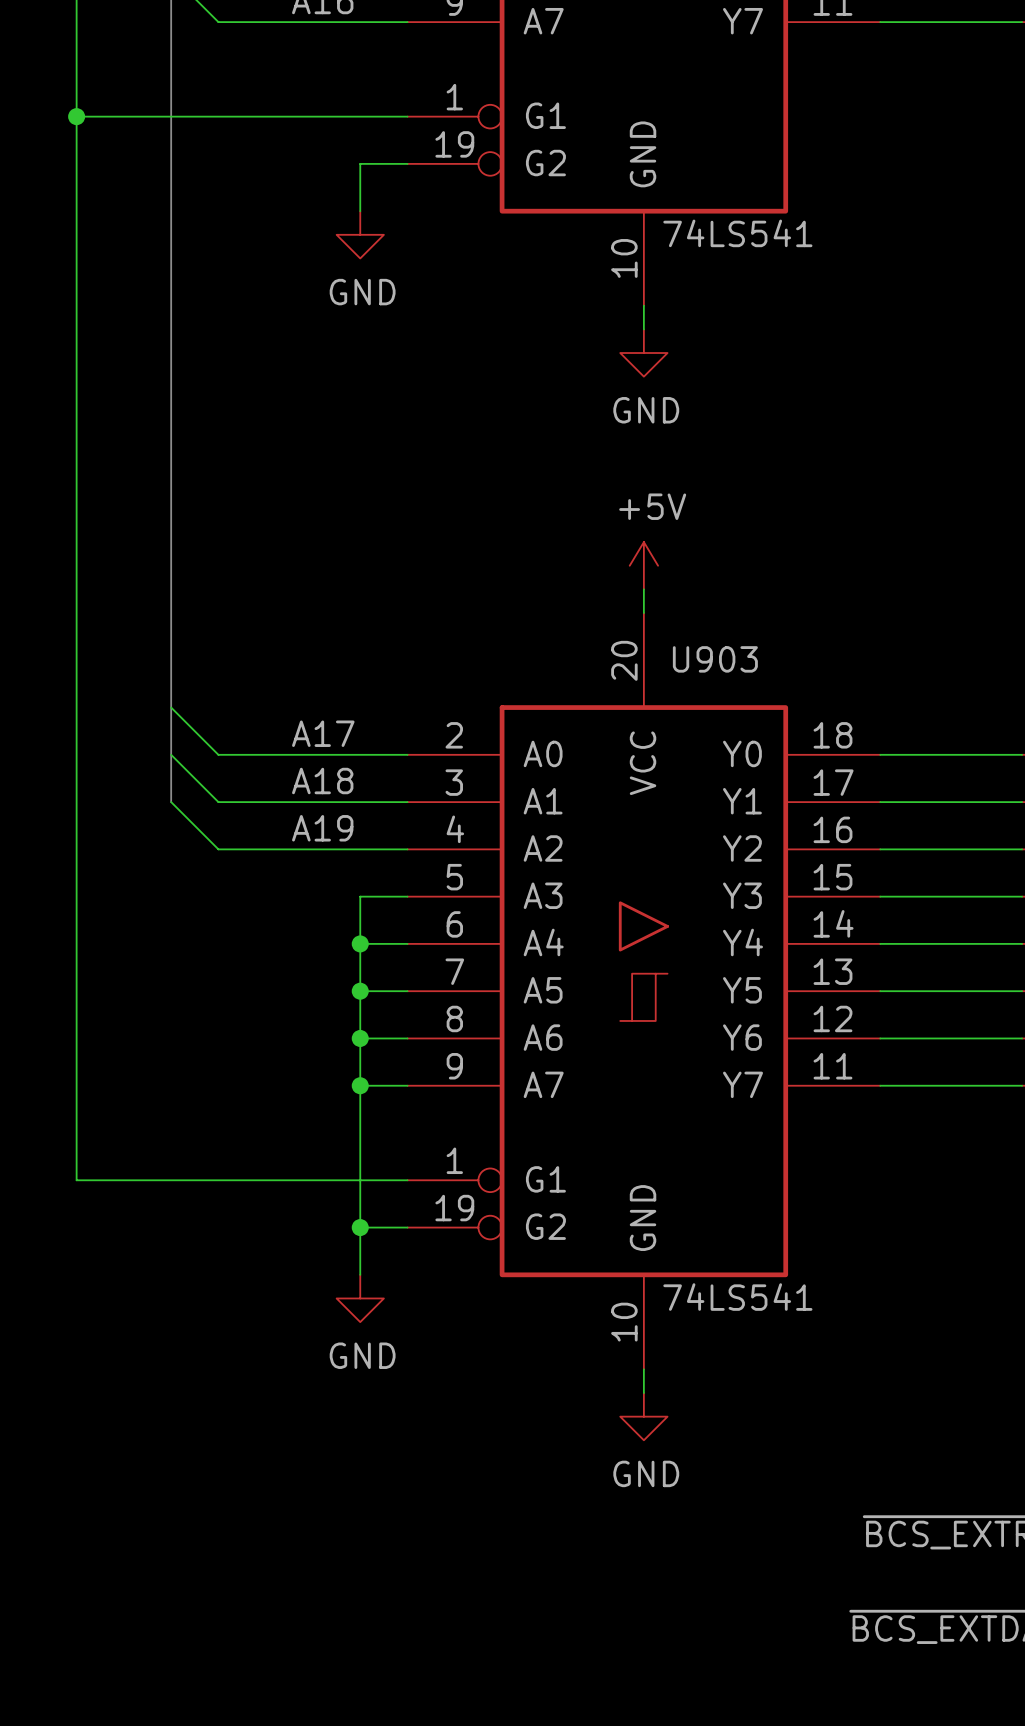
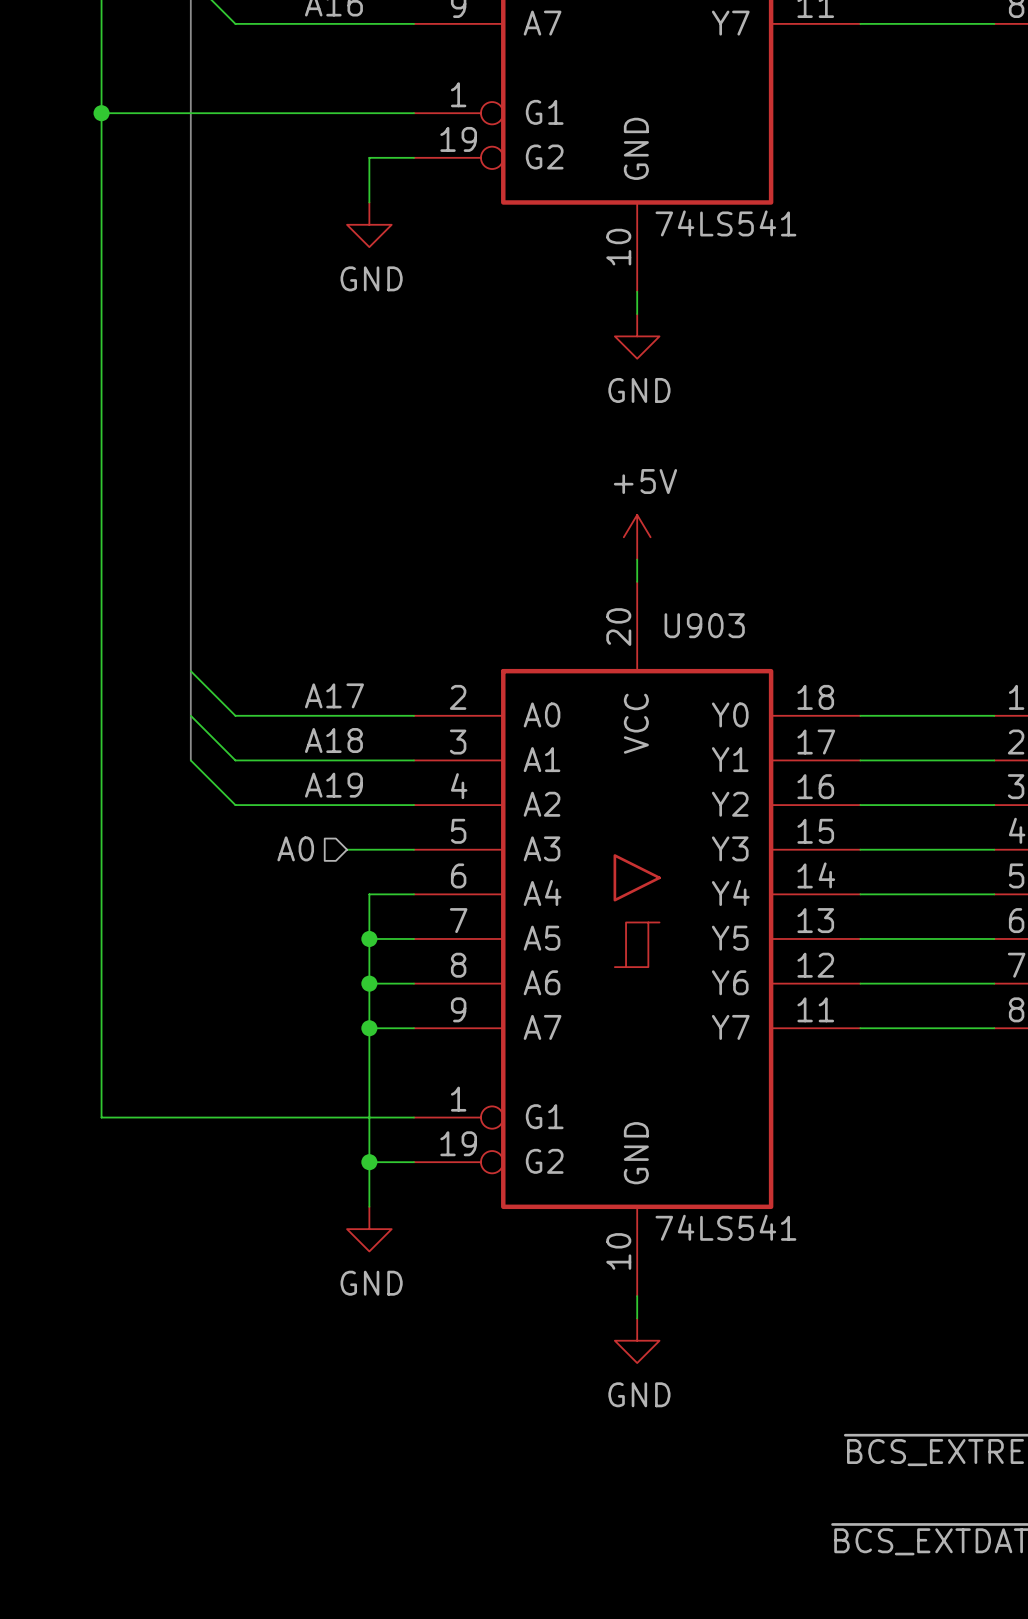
hierarchical label: none -> A0 (295, 848)
wire: (360, 896) (360, 943) -> (369, 849) (347, 849)
junction: (360, 943) -> none

